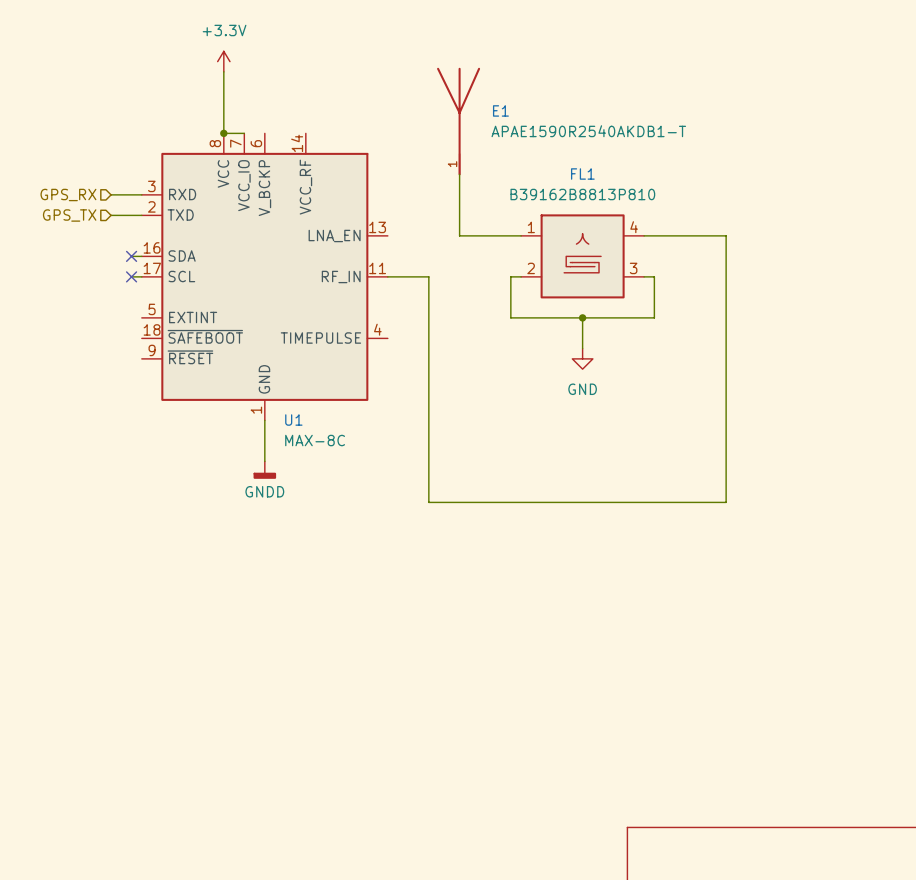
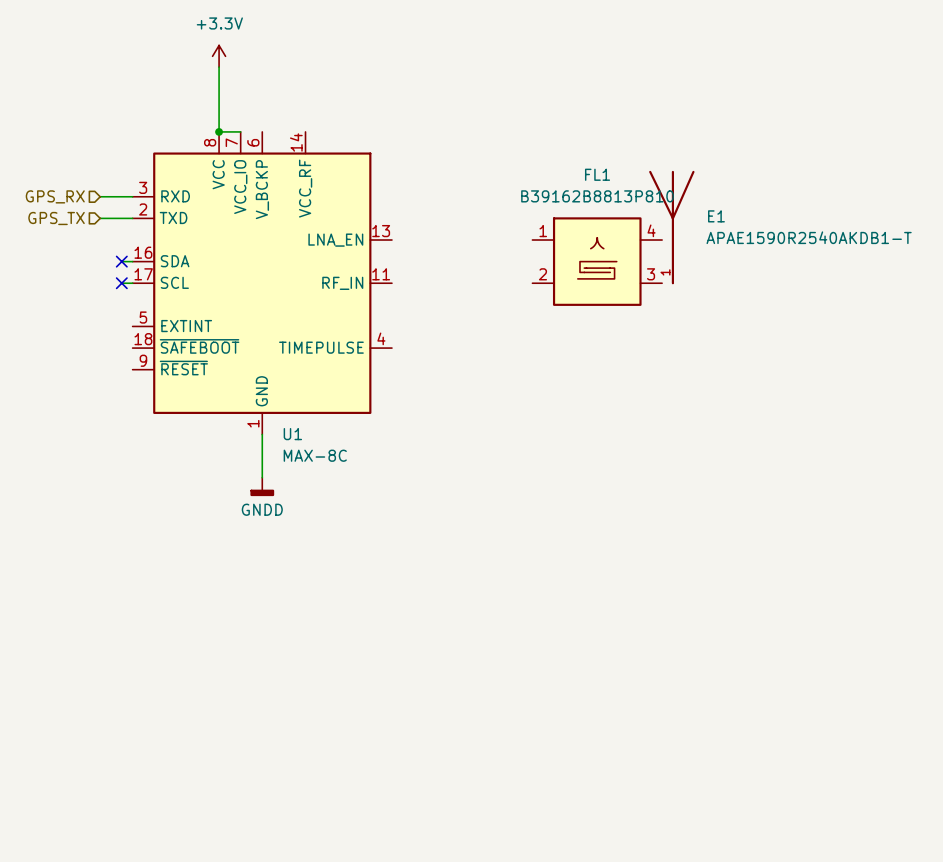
E1 position: (458, 121) -> (671, 227)
wire: (459, 174) (459, 235) (521, 235) -> none
wire: (644, 235) (726, 235) (726, 502) (428, 502) (428, 276) (387, 276) -> none
wire: (521, 276) (510, 276) (510, 317) (654, 317) (654, 276) (644, 276) -> none
wire: (582, 317) (582, 348) -> none
junction: (582, 317) -> none
power symbol: GND (582, 358) -> none

